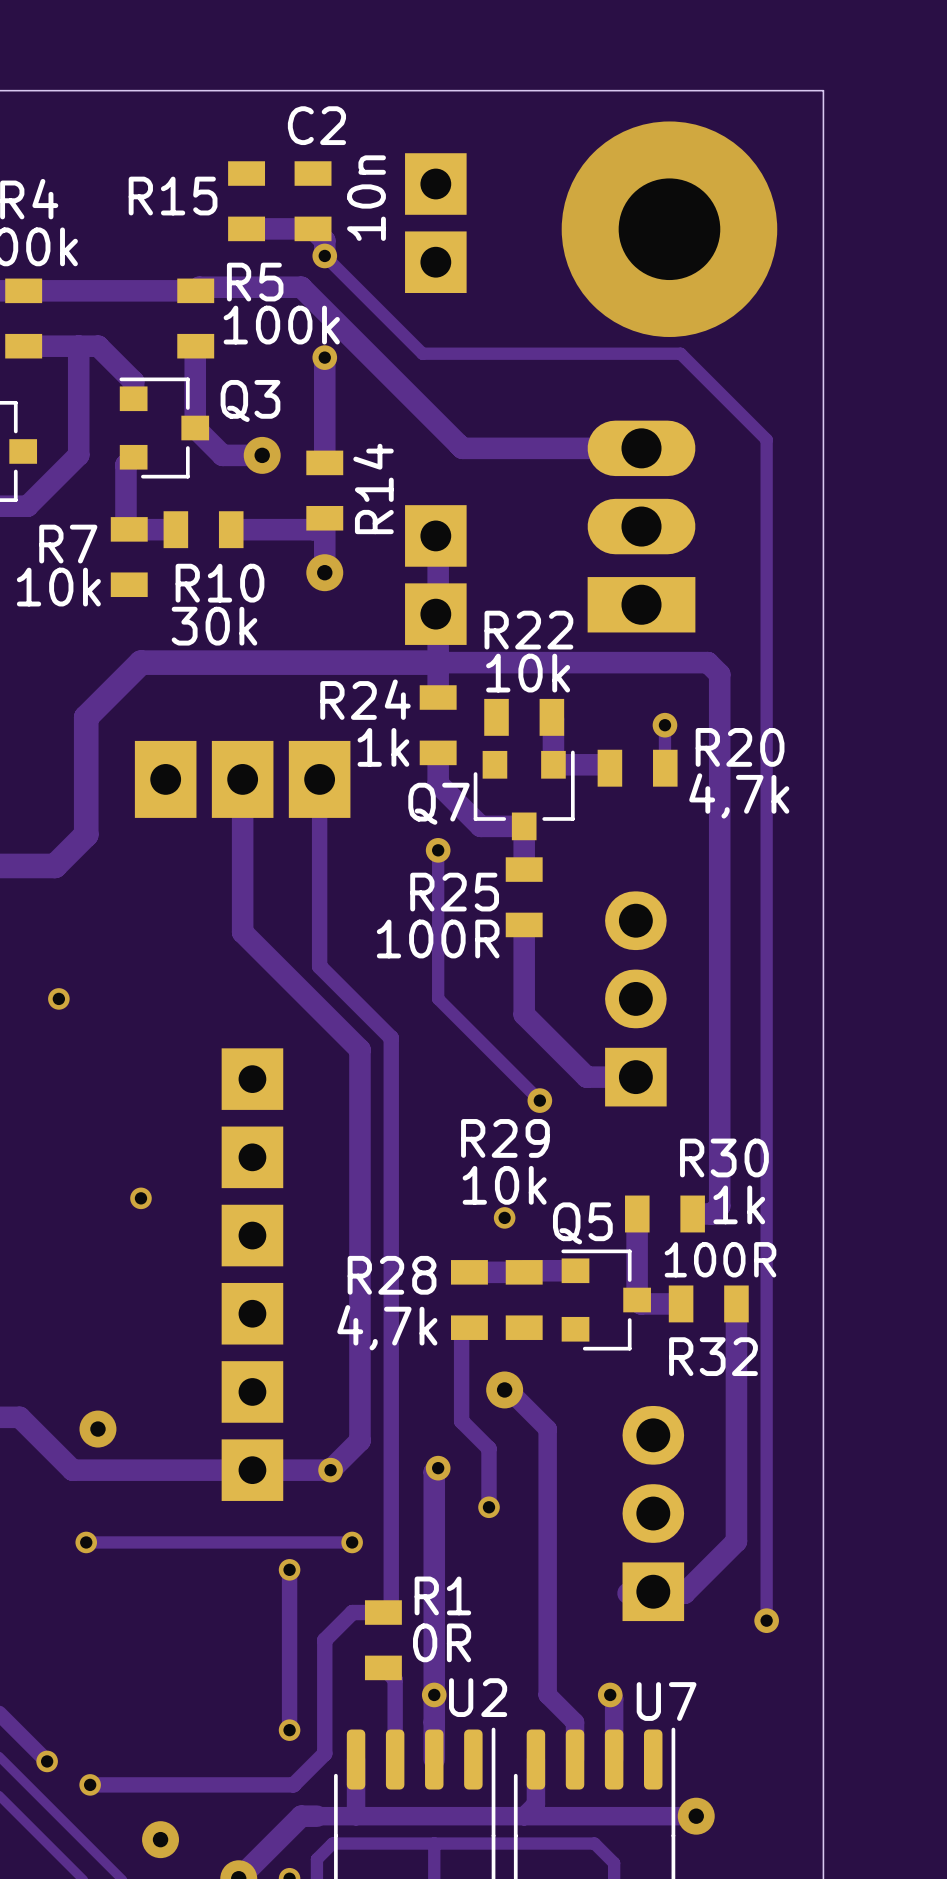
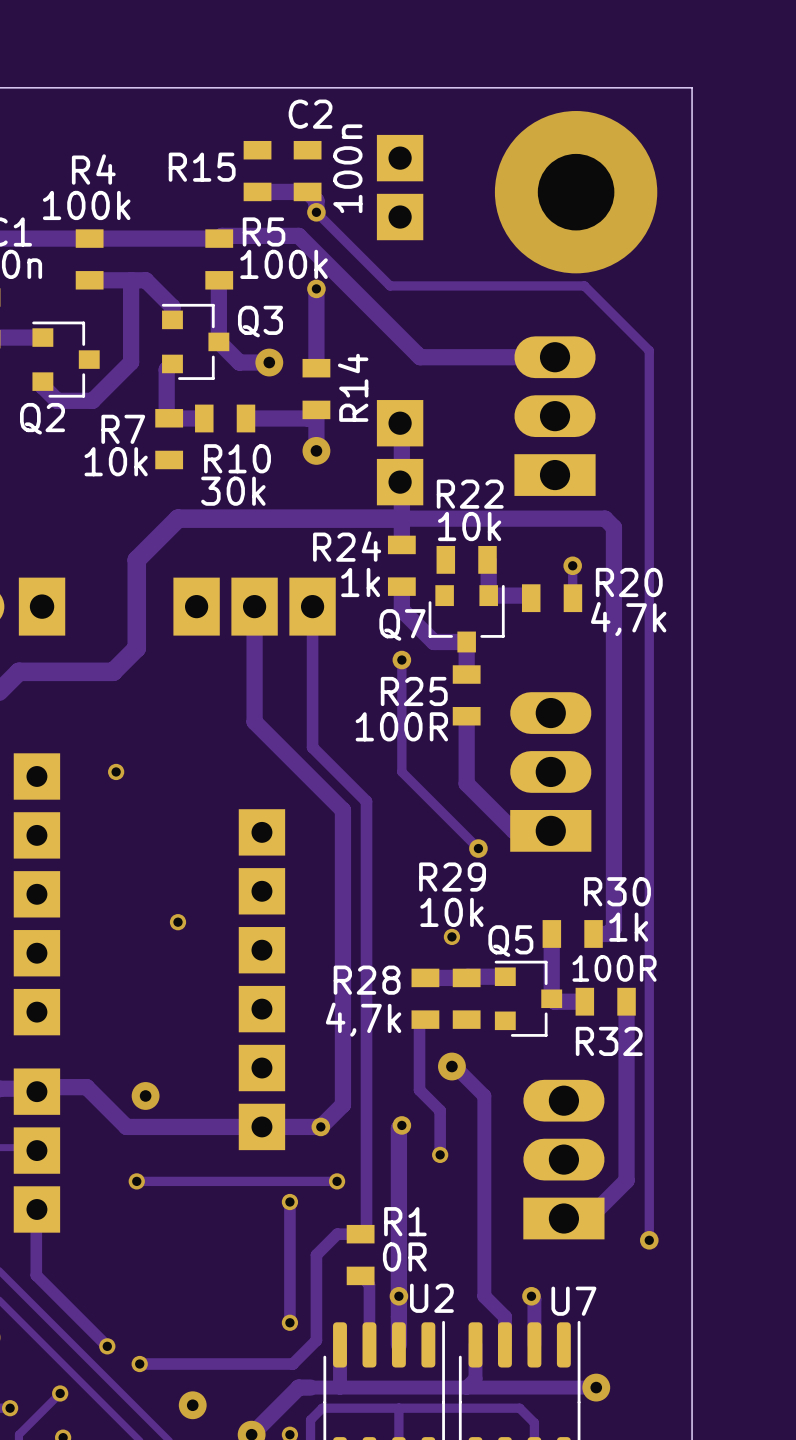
C2 value: 10n (366, 198) -> 100n (347, 168)
part footprint: [605, 891, 667, 1107] -> [510, 692, 592, 852]
part footprint: [622, 1405, 685, 1622] -> [523, 1079, 605, 1240]

